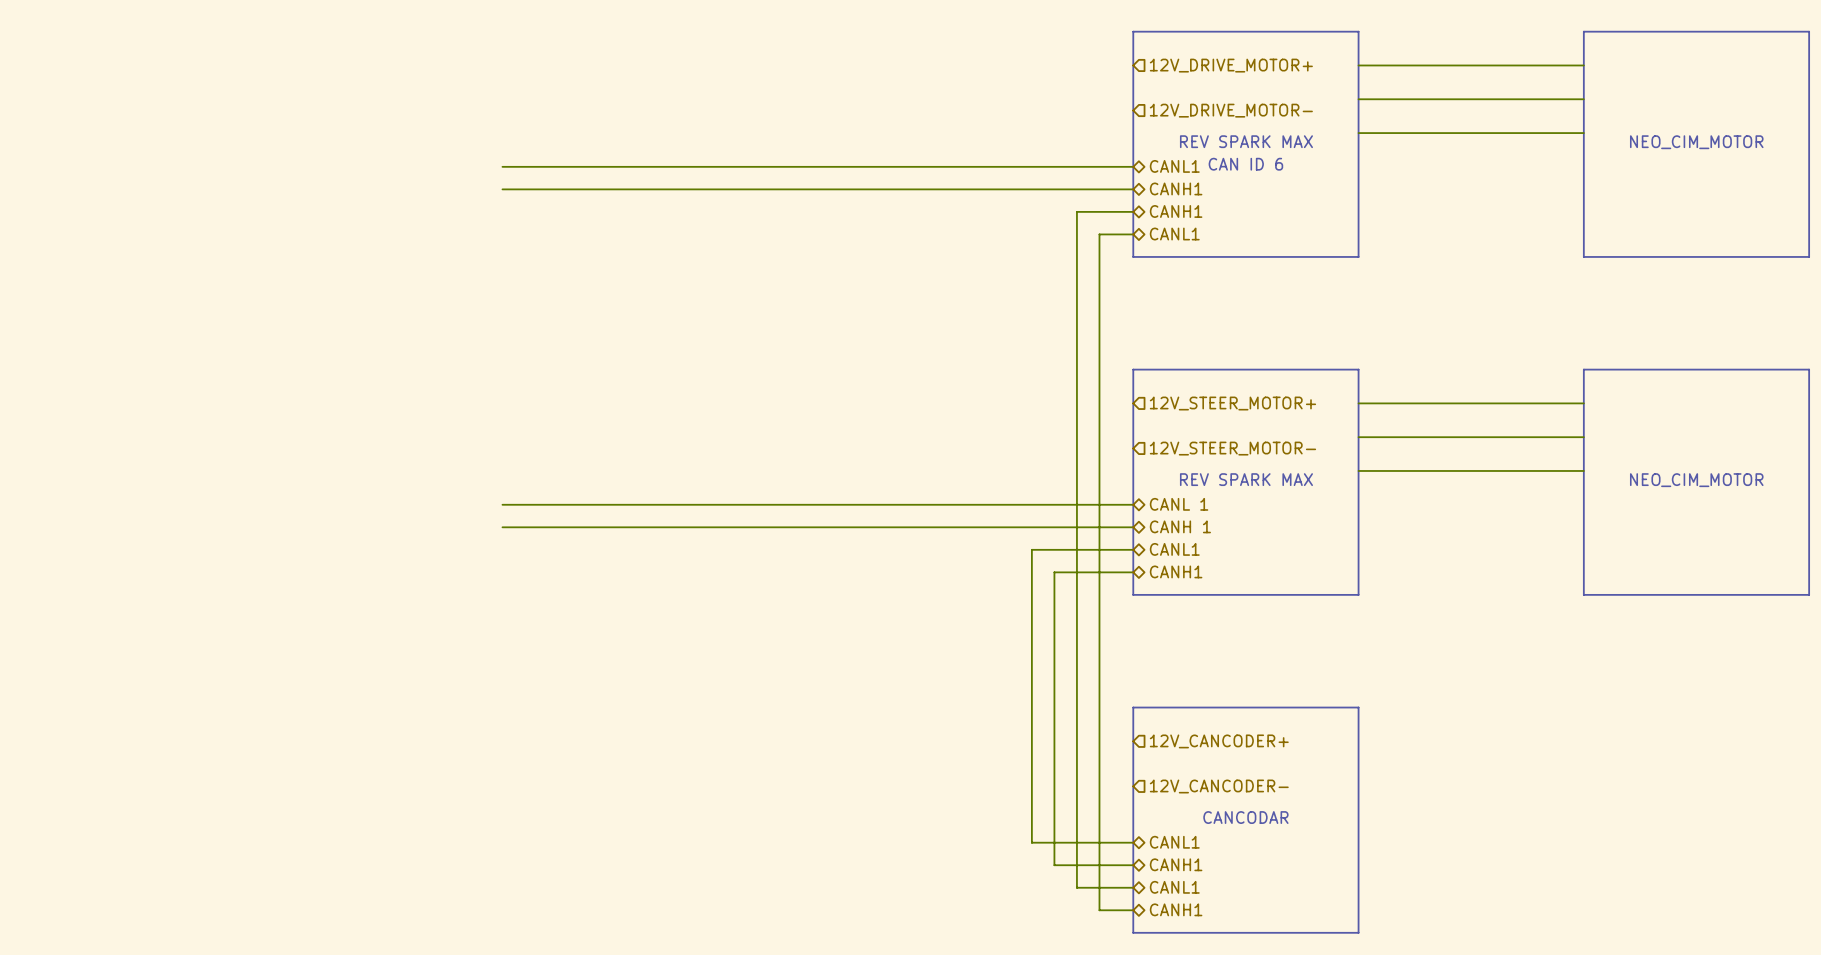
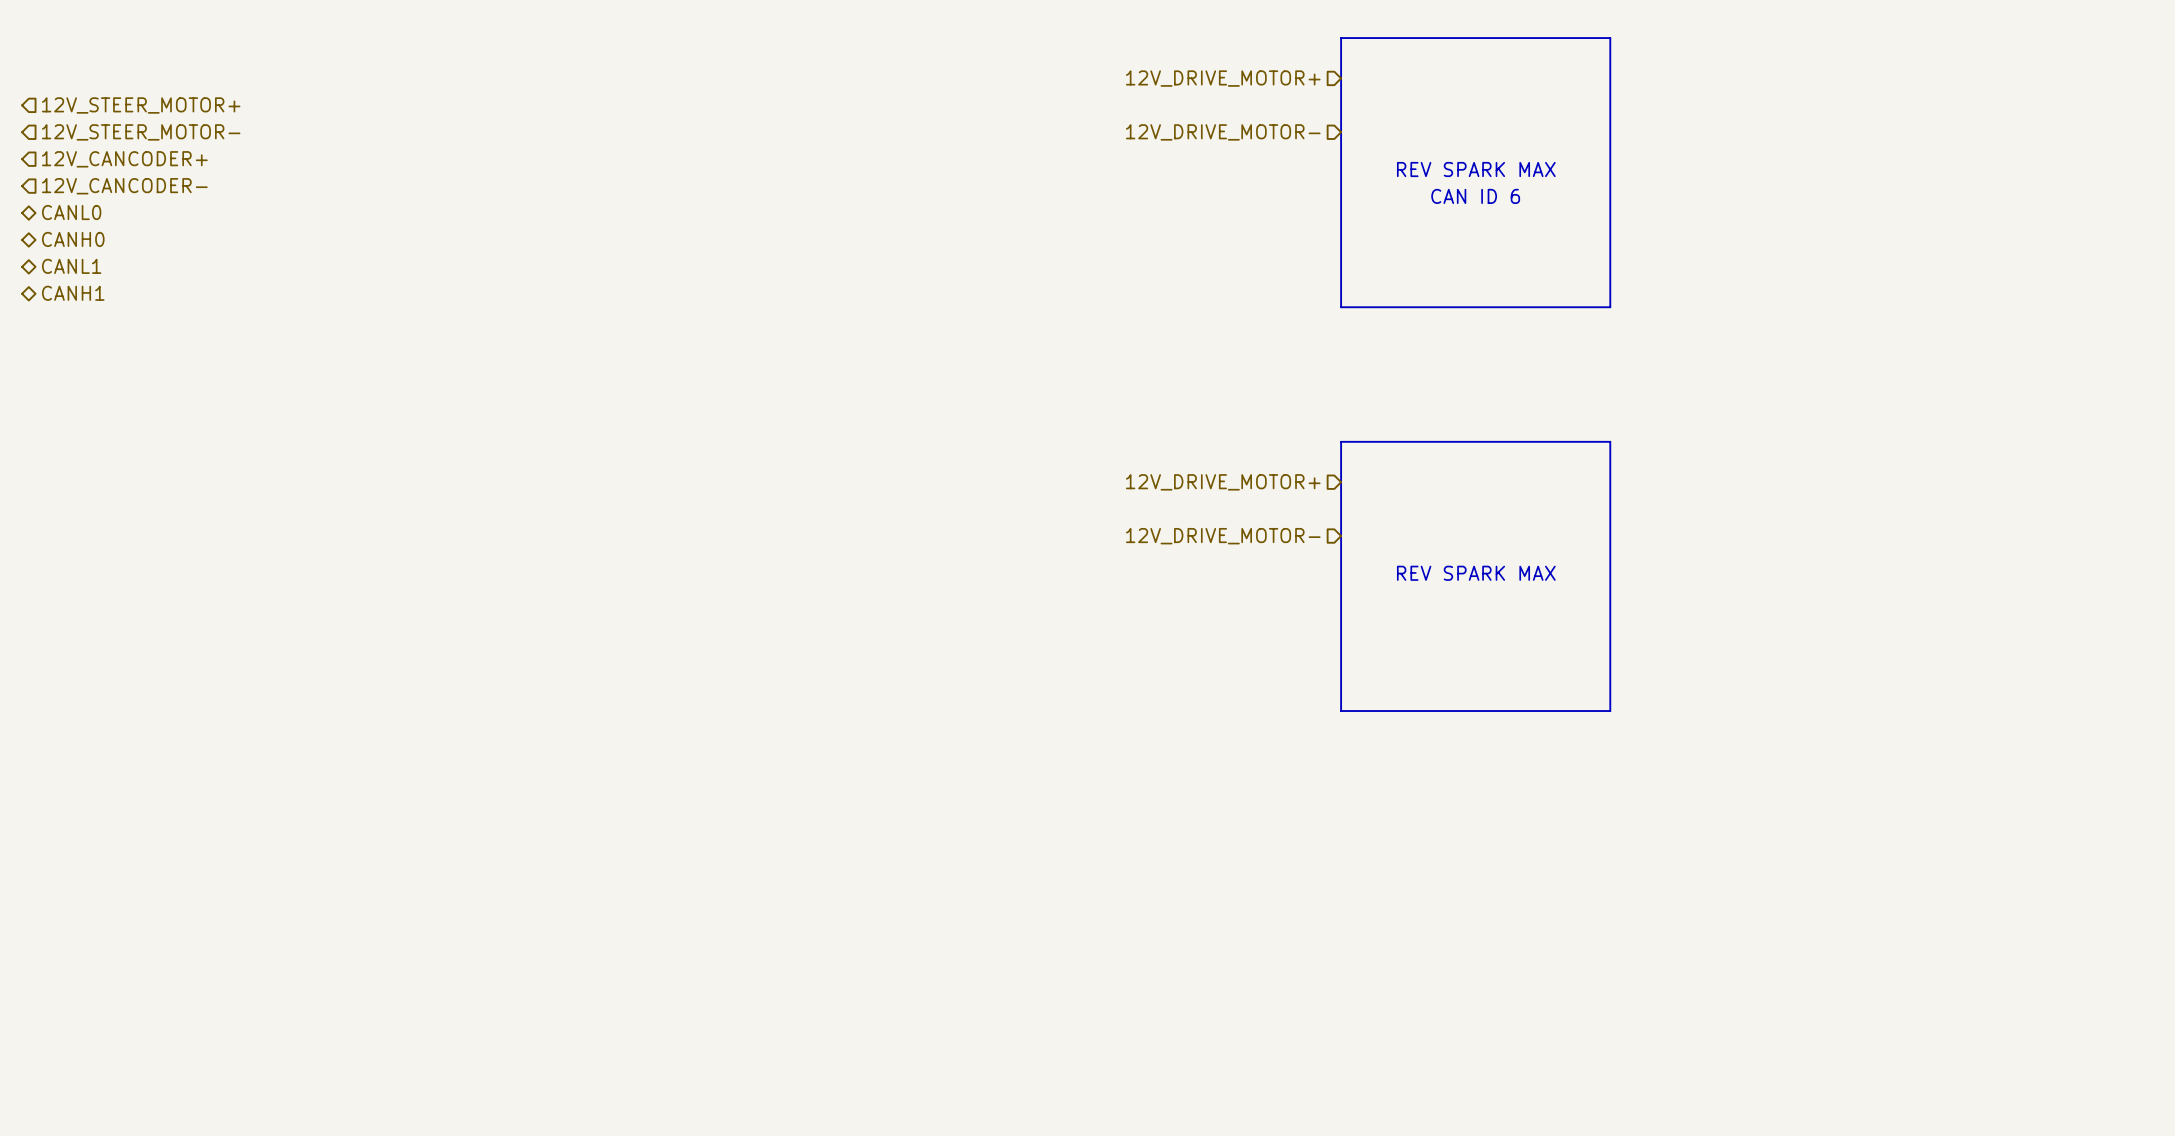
line: (1583, 31) (1809, 31) (1809, 256) (1583, 256) (1583, 31) -> none
hierarchical label rotation: 0° (1231, 65) -> 180° (1223, 78)
hierarchical label position: 12V_DRIVE_MOTOR+ (1231, 65) -> 12V_DRIVE_MOTOR+ (1223, 78)
wire: (1358, 65) (1583, 65) -> none
hierarchical label: none -> 12V_STEER_MOTOR+ (141, 105)
wire: (1358, 99) (1583, 99) -> none
hierarchical label: none -> 12V_STEER_MOTOR- (141, 132)
hierarchical label rotation: 0° (1231, 110) -> 180° (1223, 132)
hierarchical label position: 12V_DRIVE_MOTOR- (1231, 110) -> 12V_DRIVE_MOTOR- (1223, 132)
hierarchical label: none -> 12V_CANCODER+ (124, 159)
wire: (1358, 133) (1583, 133) -> none
text: NEO_CIM_MOTOR (1696, 142) -> none
hierarchical label: none -> 12V_CANCODER- (124, 186)
wire: (502, 166) (1133, 166) -> none
hierarchical label: CANL1 (1174, 166) -> none
hierarchical label: none -> CANL0 (71, 212)
hierarchical label: CANH1 (1176, 188) -> none
wire: (502, 189) (1133, 189) -> none
hierarchical label: none -> CANH0 (73, 239)
wire: (1133, 211) (1076, 211) (1076, 887) (1133, 887) -> none
hierarchical label: CANH1 (1176, 211) -> none
hierarchical label: none -> CANL1 (71, 266)
wire: (1133, 234) (1099, 234) (1099, 910) (1133, 910) -> none
hierarchical label: CANL1 (1174, 234) -> none
hierarchical label: none -> CANH1 (73, 293)
line: (1583, 369) (1809, 369) (1809, 594) (1583, 594) (1583, 369) -> none
hierarchical label: none -> 12V_DRIVE_MOTOR+ (1223, 482)
hierarchical label: 12V_STEER_MOTOR+ (1232, 403) -> none
wire: (1358, 403) (1583, 403) -> none
wire: (1358, 437) (1583, 437) -> none
hierarchical label: none -> 12V_DRIVE_MOTOR- (1223, 536)
hierarchical label: 12V_STEER_MOTOR- (1232, 448) -> none
wire: (1358, 470) (1583, 470) -> none
text: NEO_CIM_MOTOR (1696, 480) -> none
wire: (502, 504) (1133, 504) -> none
hierarchical label: CANL 1 (1179, 504) -> none
hierarchical label: CANH 1 (1180, 526) -> none
wire: (502, 527) (1133, 527) -> none
wire: (1133, 549) (1031, 549) (1031, 842) (1133, 842) -> none
hierarchical label: CANL1 (1174, 549) -> none
hierarchical label: CANH1 (1176, 571) -> none
wire: (1133, 572) (1054, 572) (1054, 865) (1133, 865) -> none
line: (1133, 707) (1133, 932) (1358, 932) (1358, 707) (1133, 707) -> none
hierarchical label: 12V_CANCODER+ (1219, 741) -> none
hierarchical label: 12V_CANCODER- (1219, 786) -> none
text: CANCODAR (1245, 817) -> none
hierarchical label: CANL1 (1174, 842) -> none
hierarchical label: CANH1 (1176, 864) -> none
hierarchical label: CANL1 (1174, 887) -> none
hierarchical label: CANH1 (1176, 909) -> none

